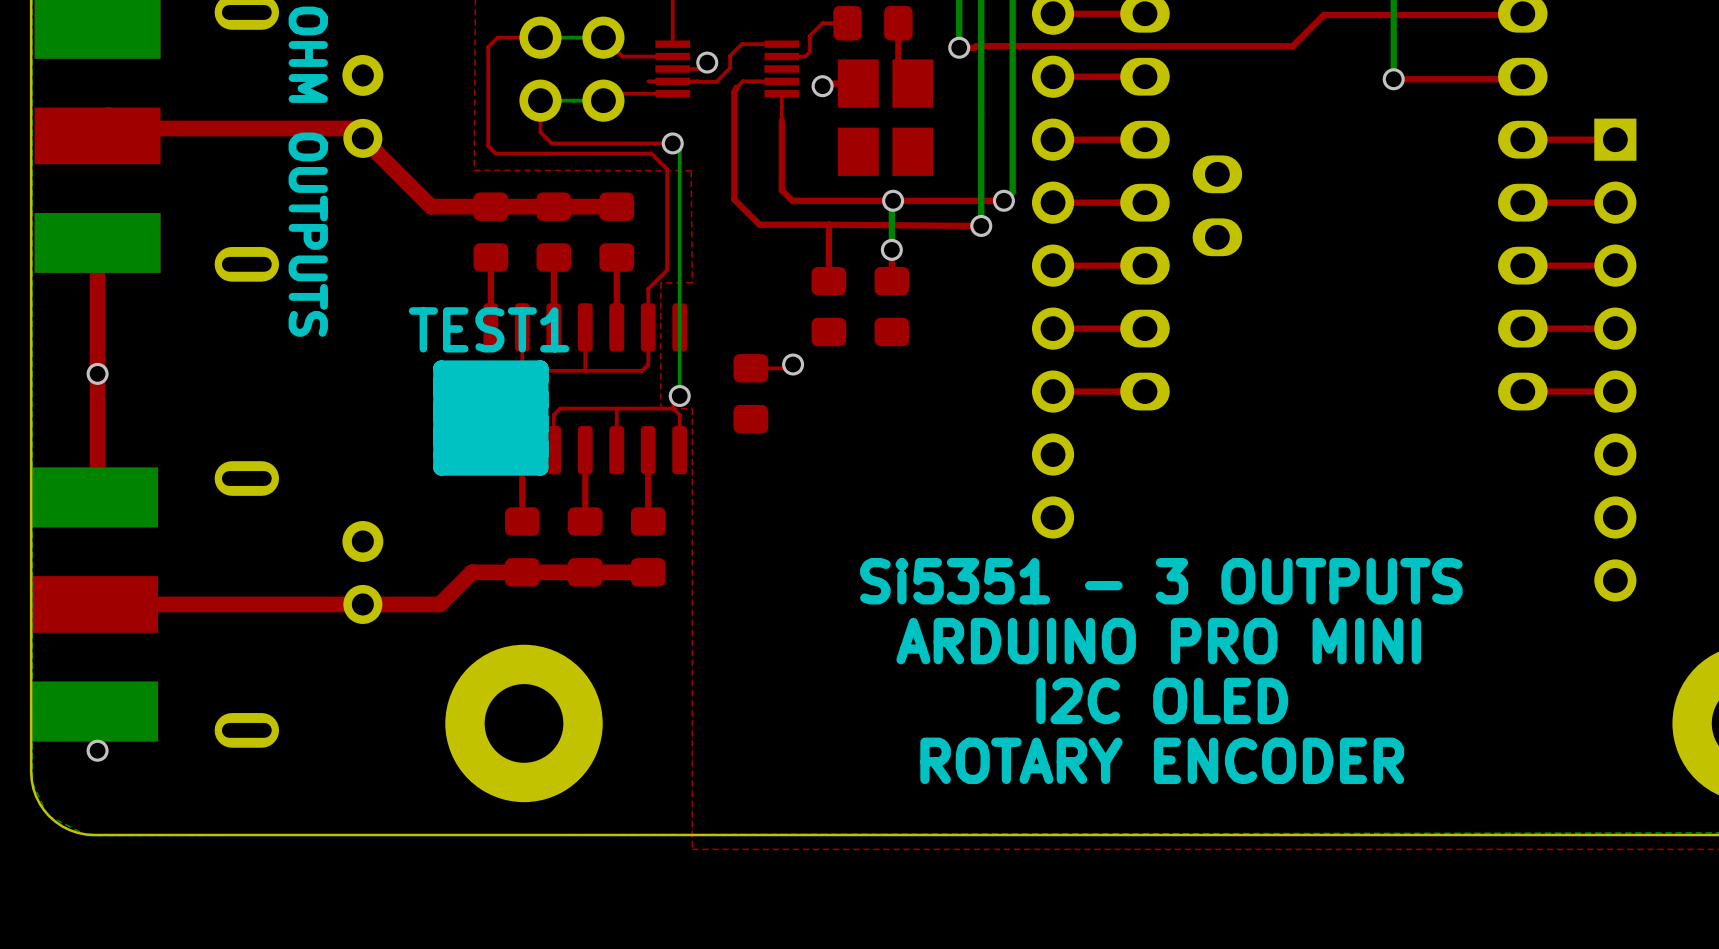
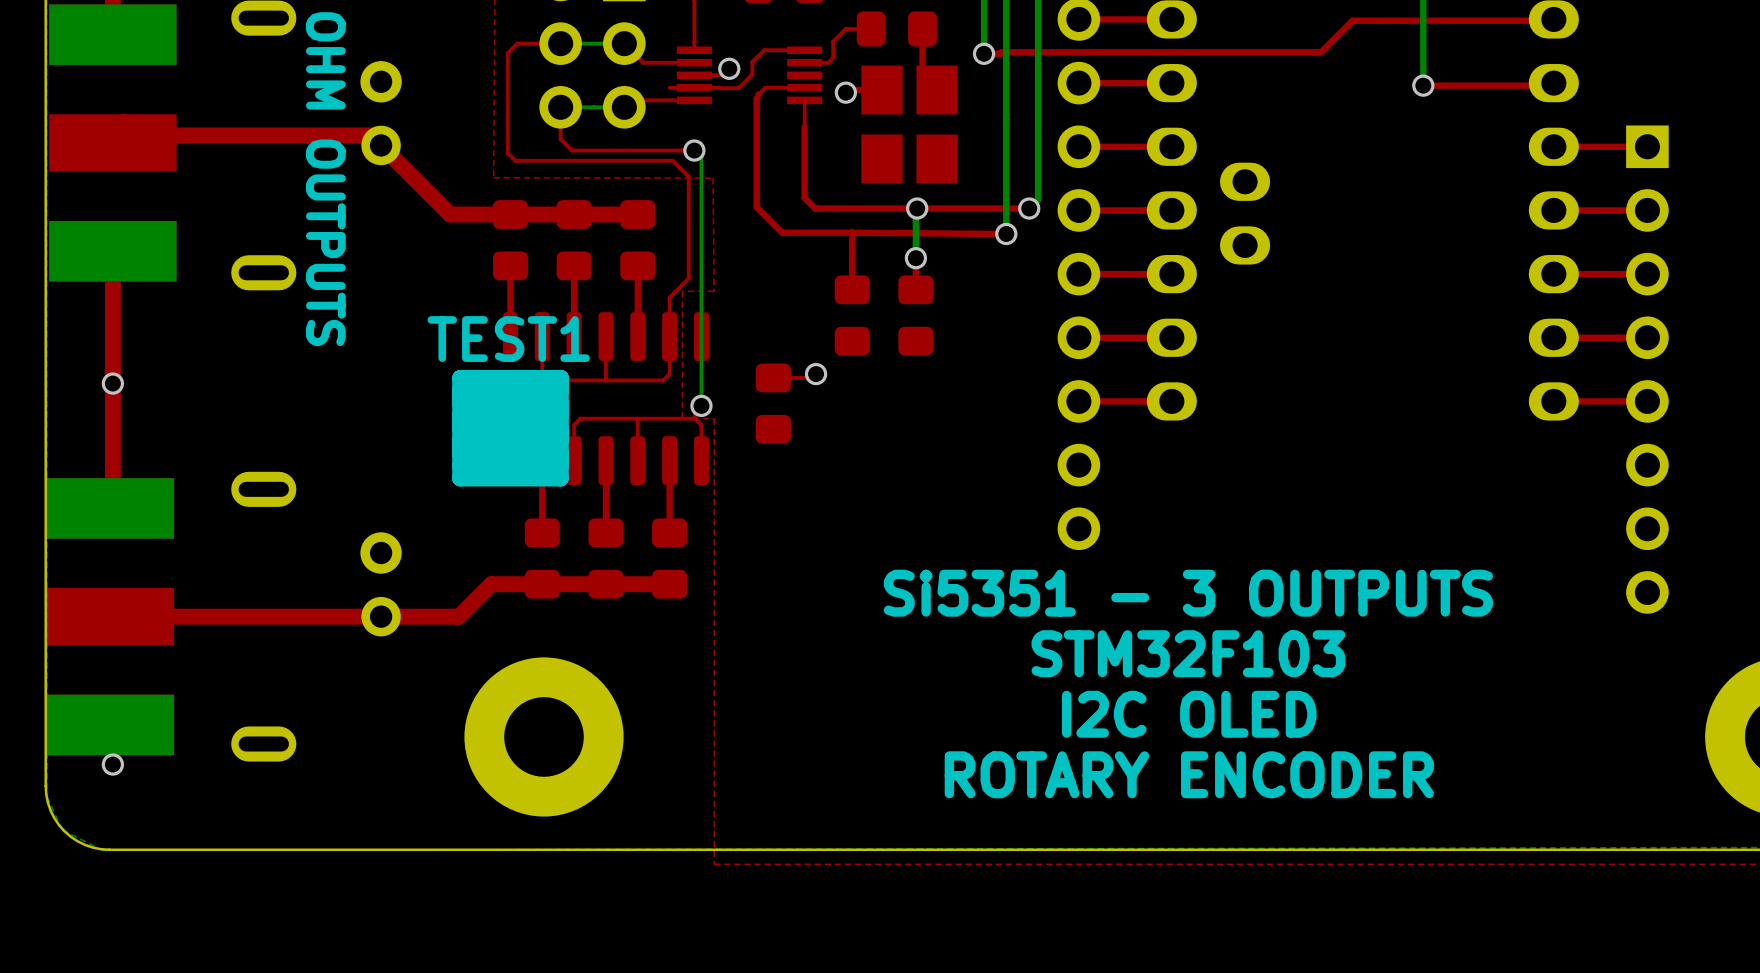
text: ARDUINO PRO MINI (1158, 641) -> STM32F103 (1188, 653)

